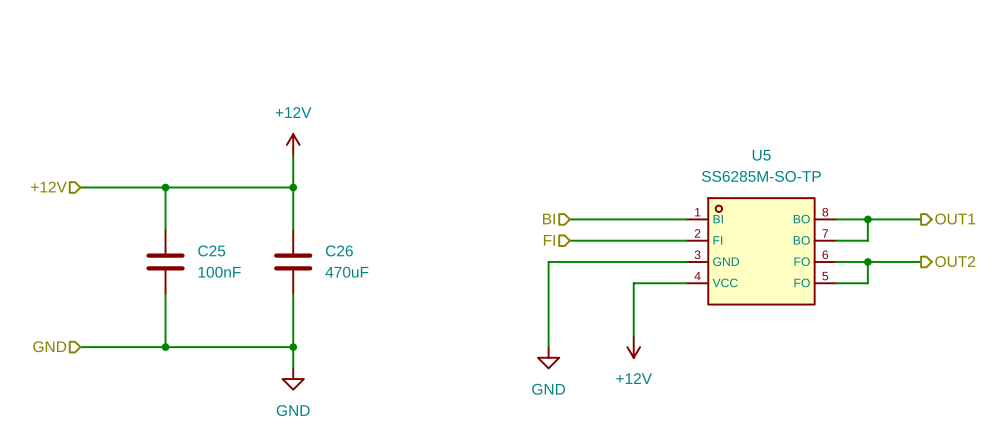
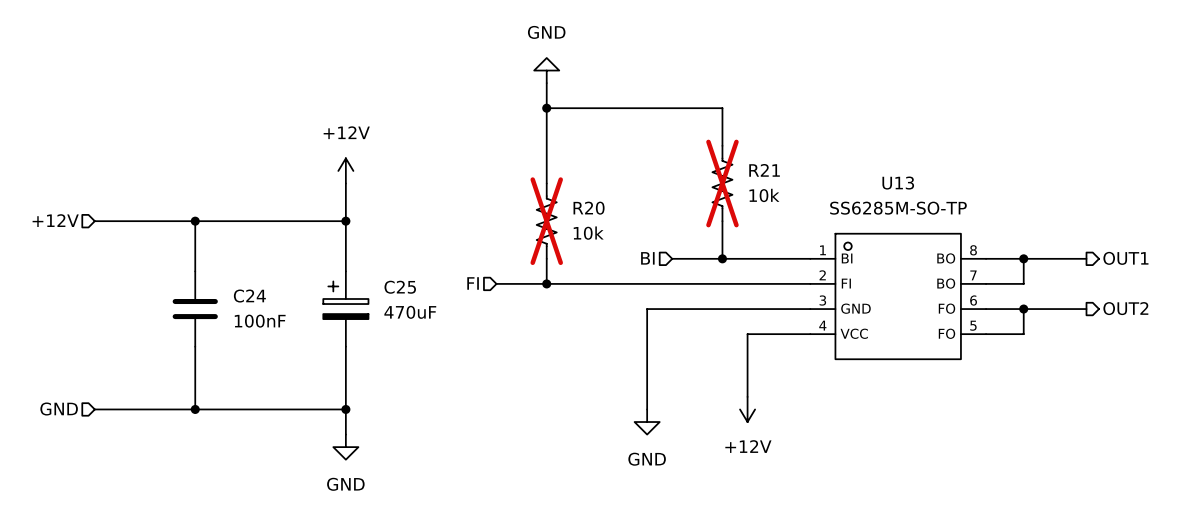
power symbol: none -> GND (546, 70)
wire: none -> (546, 83) (546, 183)
wire: none -> (546, 108) (722, 108) (722, 145)
junction: none -> (546, 108)
R21: none -> 10k (722, 183)
U5 name: U5 (761, 155) -> U13 (898, 183)
R20: none -> 10k (546, 221)
wire: none -> (722, 221) (722, 258)
wire: none -> (546, 258) (546, 283)
junction: none -> (722, 258)
wire: none -> (496, 283) (672, 283)
junction: none -> (546, 283)
hierarchical label position: FI (549, 240) -> FI (473, 283)
C25 name: C25 (211, 250) -> C24 (249, 296)
C26: 470uF (293, 261) -> none
C25: none -> 470uF (345, 309)

